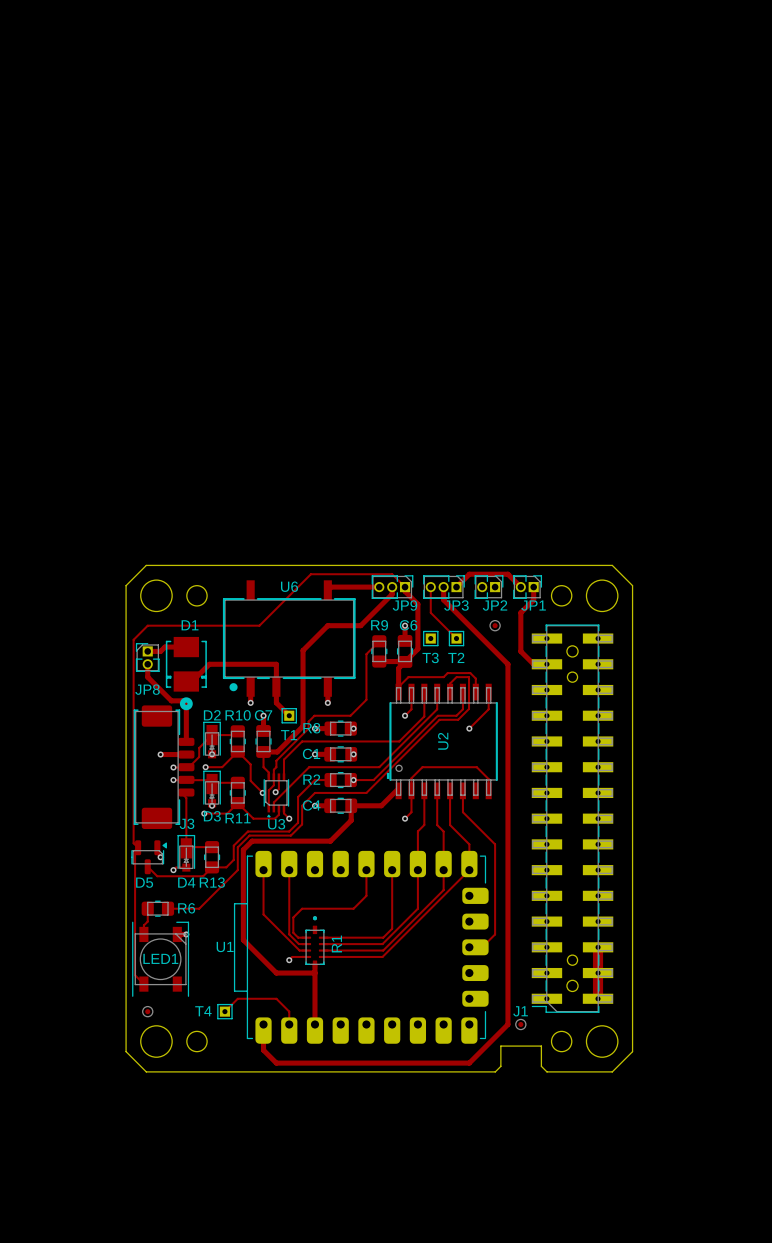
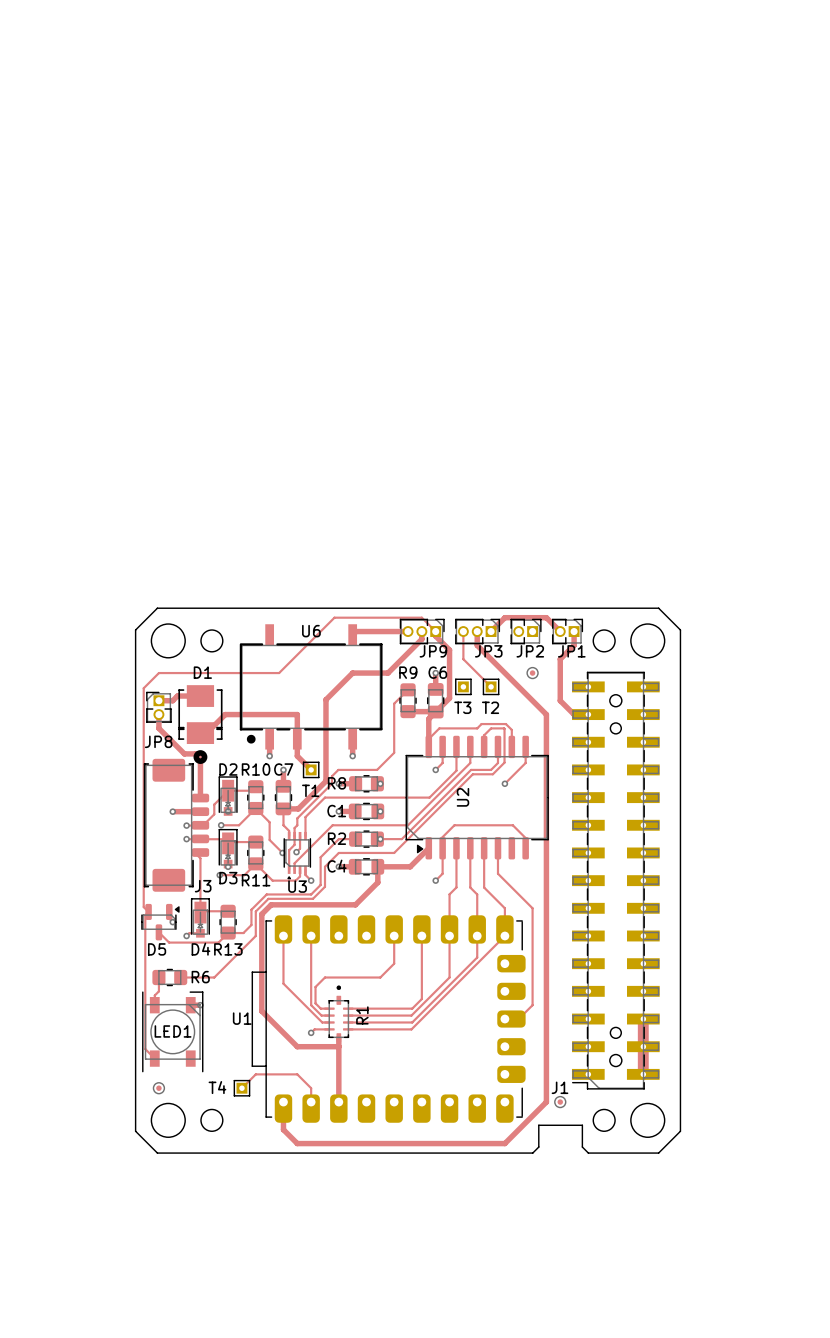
U2 footprint: [386, 683, 498, 800] -> [405, 735, 549, 860]

